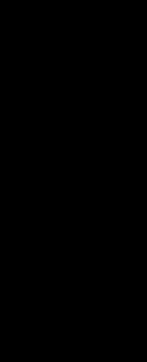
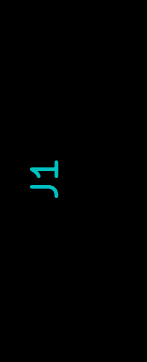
J1 name: none -> J1 (44, 179)

